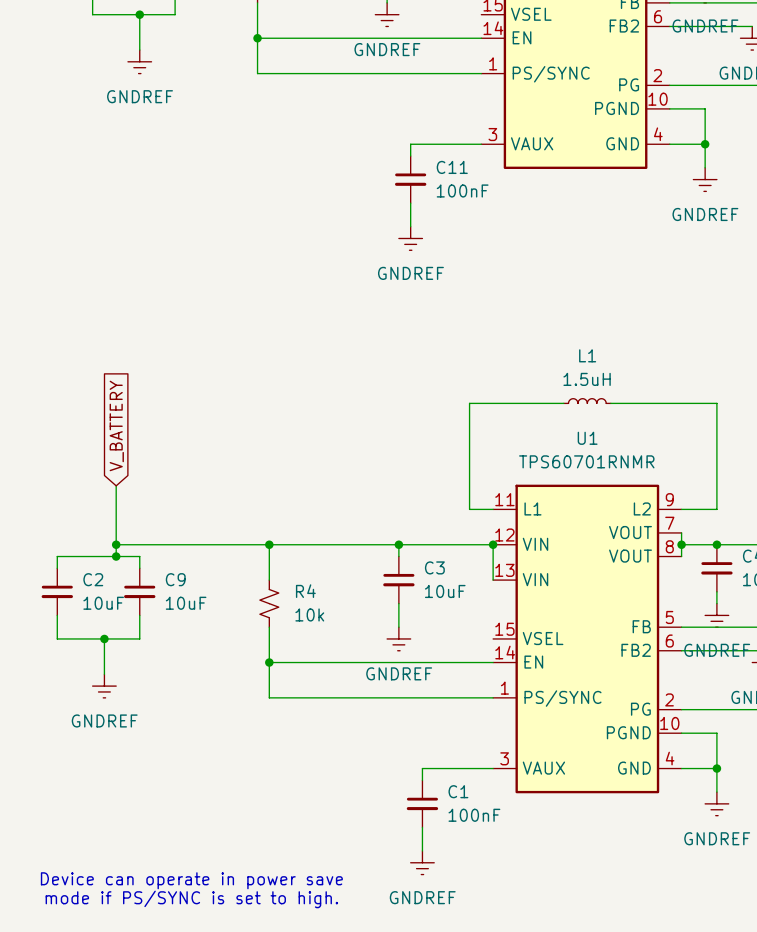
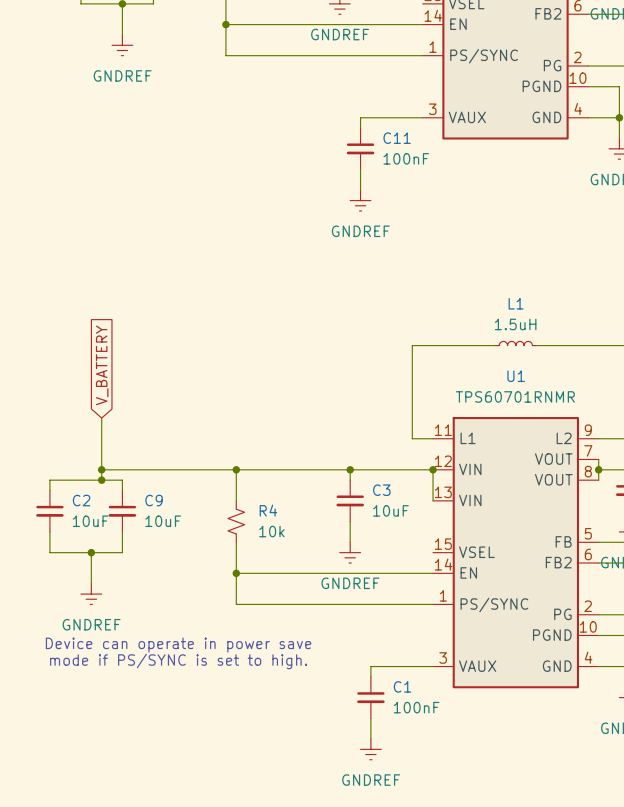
text position: Device can operate in power save (191, 880) -> Device can operate in power save (178, 645)
text position: mode if PS/SYNC is set to high. (191, 899) -> mode if PS/SYNC is set to high. (178, 661)

